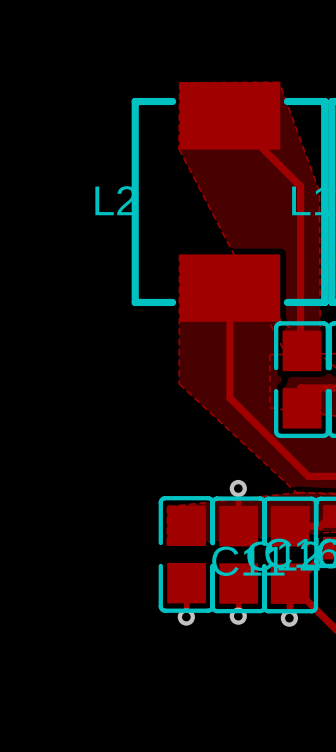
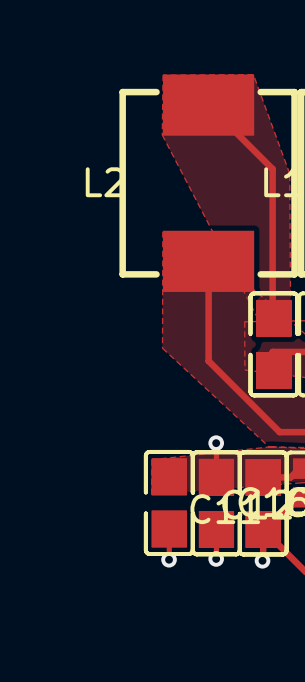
part: none -> (273, 344)
part: none -> (169, 502)
part: none -> (216, 503)
part: none -> (263, 503)

